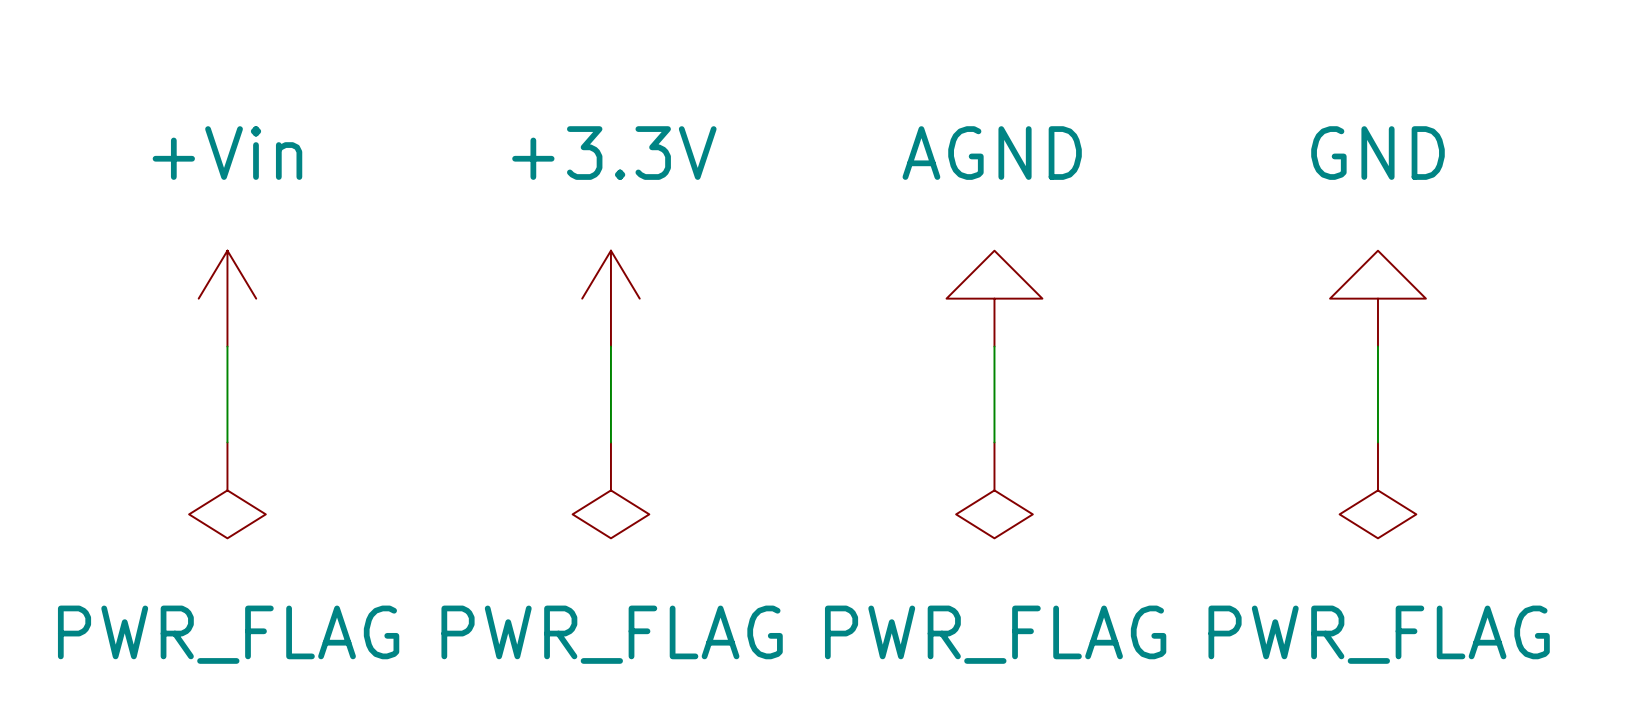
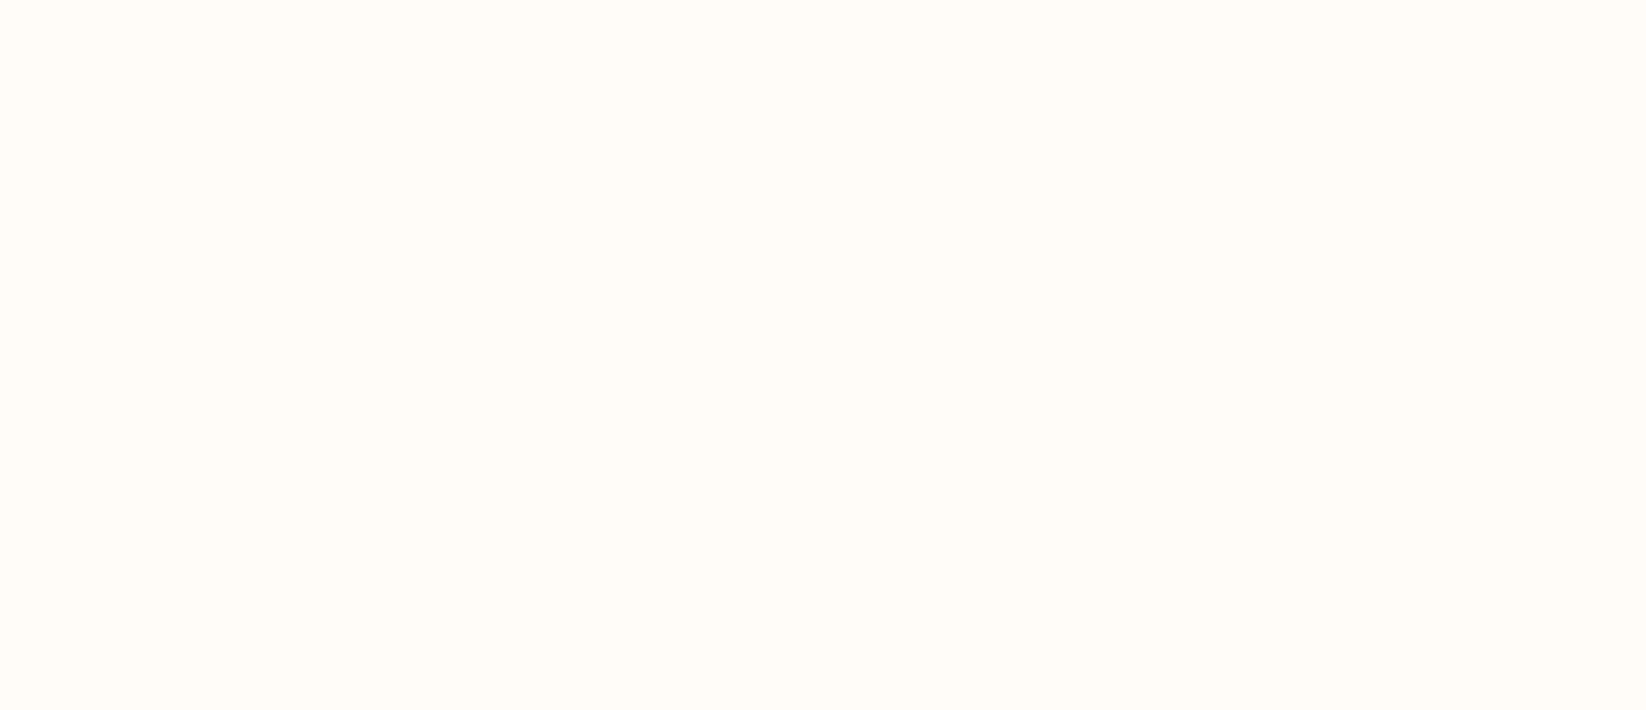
power symbol: +Vin (227, 298) -> none
power symbol: +3.3V (610, 298) -> none
power symbol: AGND (994, 298) -> none
power symbol: GND (1377, 298) -> none
wire: (227, 346) (227, 442) -> none
wire: (610, 346) (610, 442) -> none
wire: (994, 346) (994, 442) -> none
wire: (1377, 346) (1377, 442) -> none
power symbol: PWR_FLAG (227, 490) -> none
power symbol: PWR_FLAG (610, 490) -> none
power symbol: PWR_FLAG (994, 490) -> none
power symbol: PWR_FLAG (1377, 490) -> none

